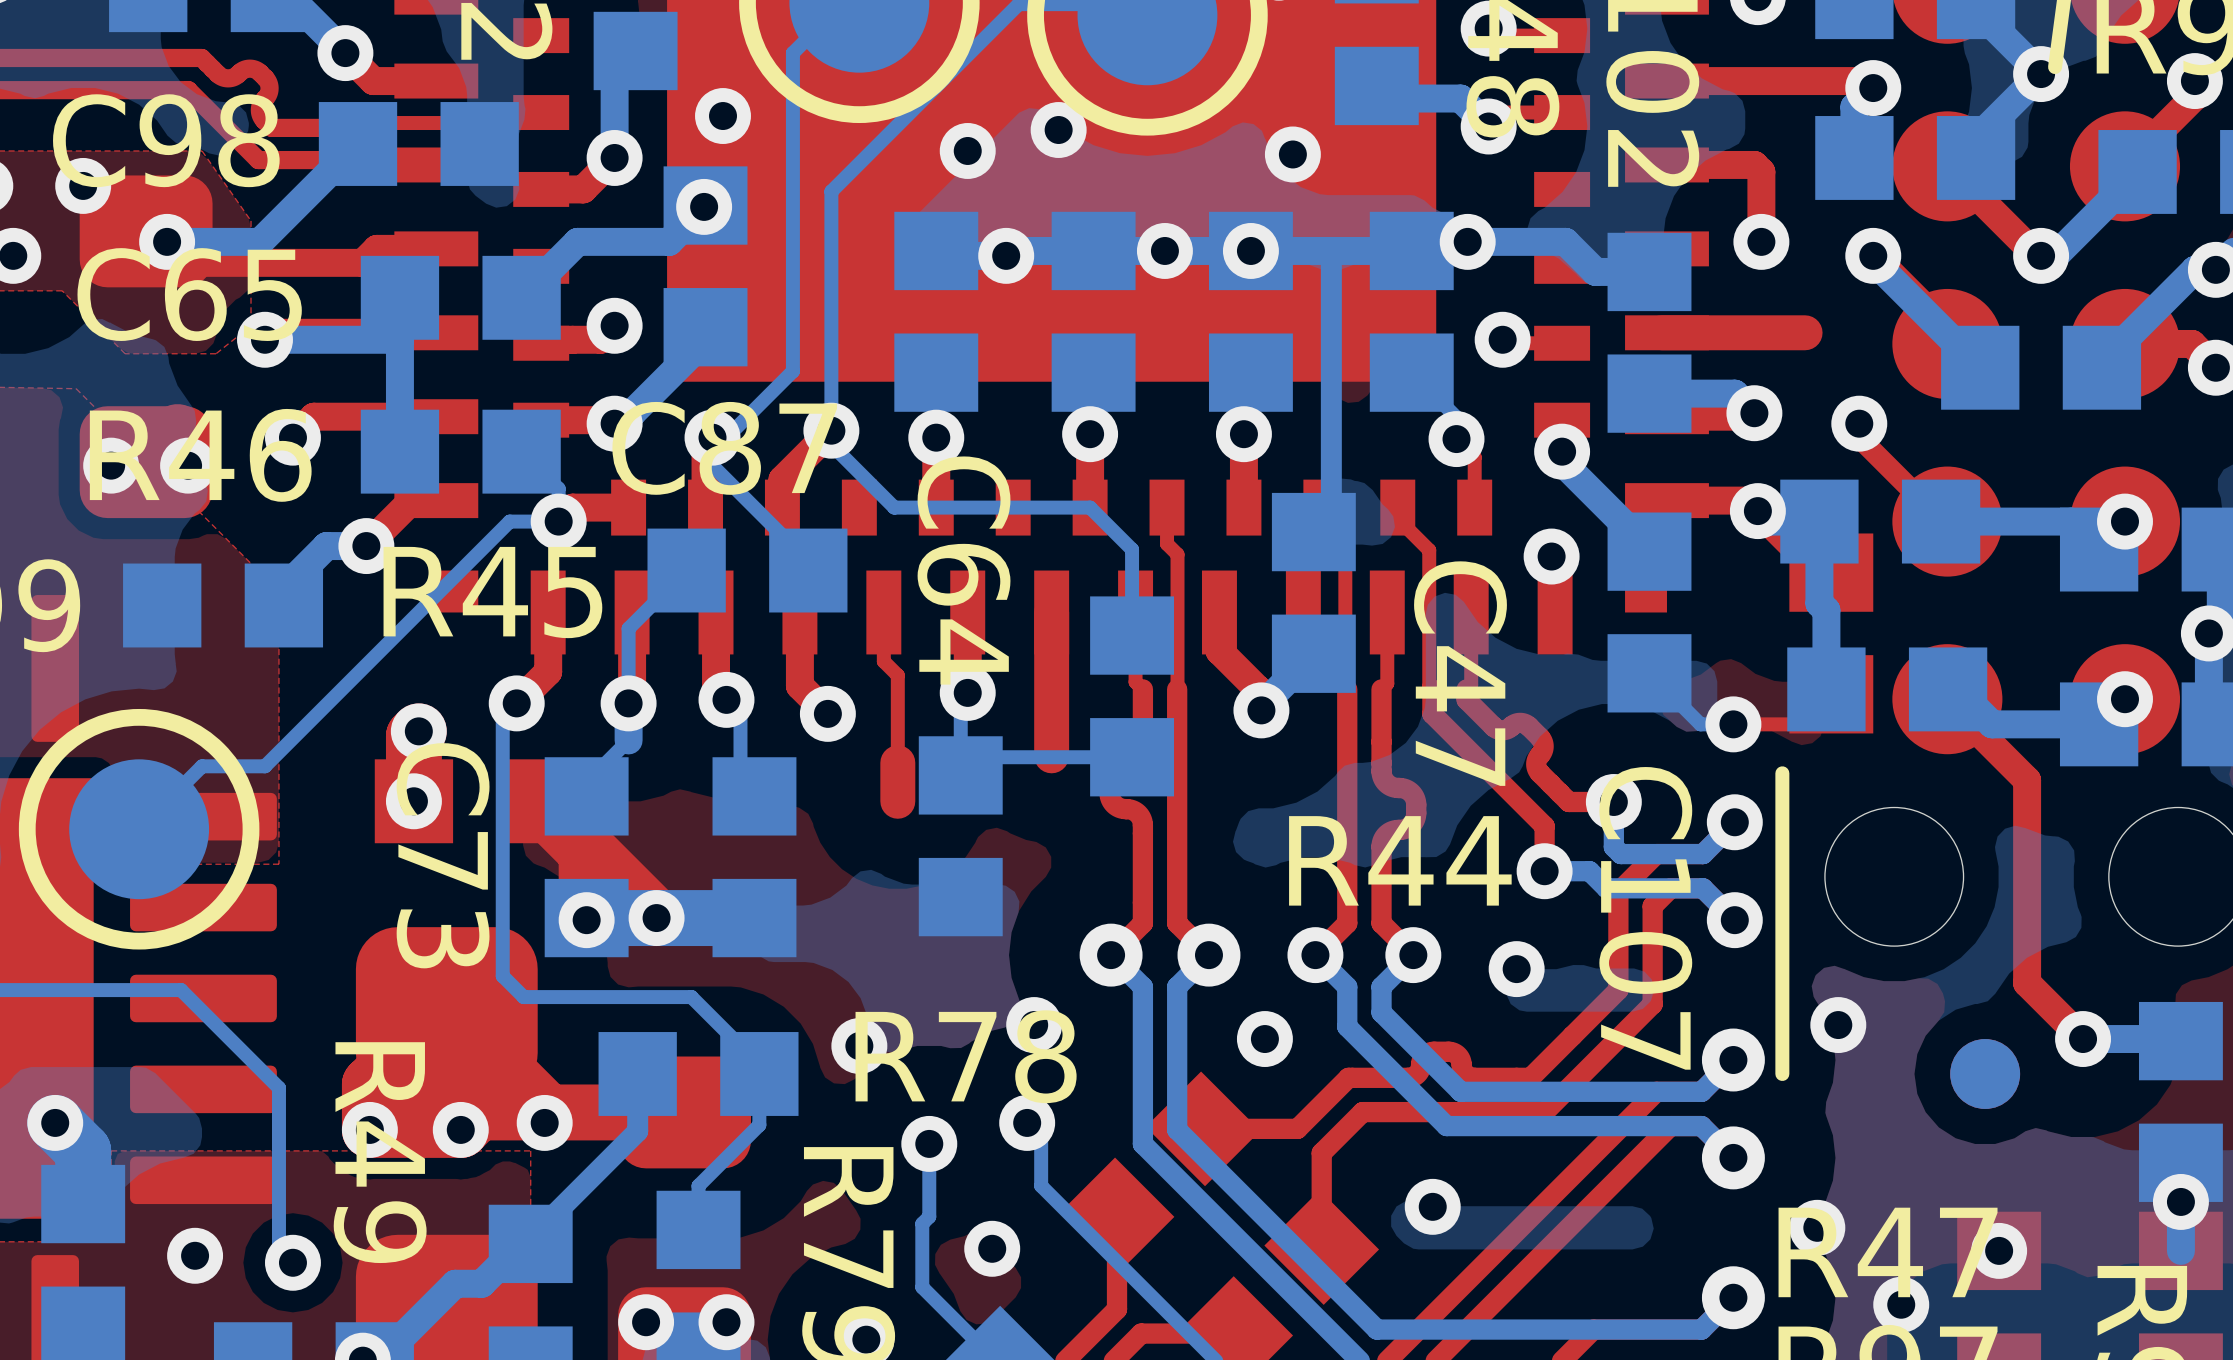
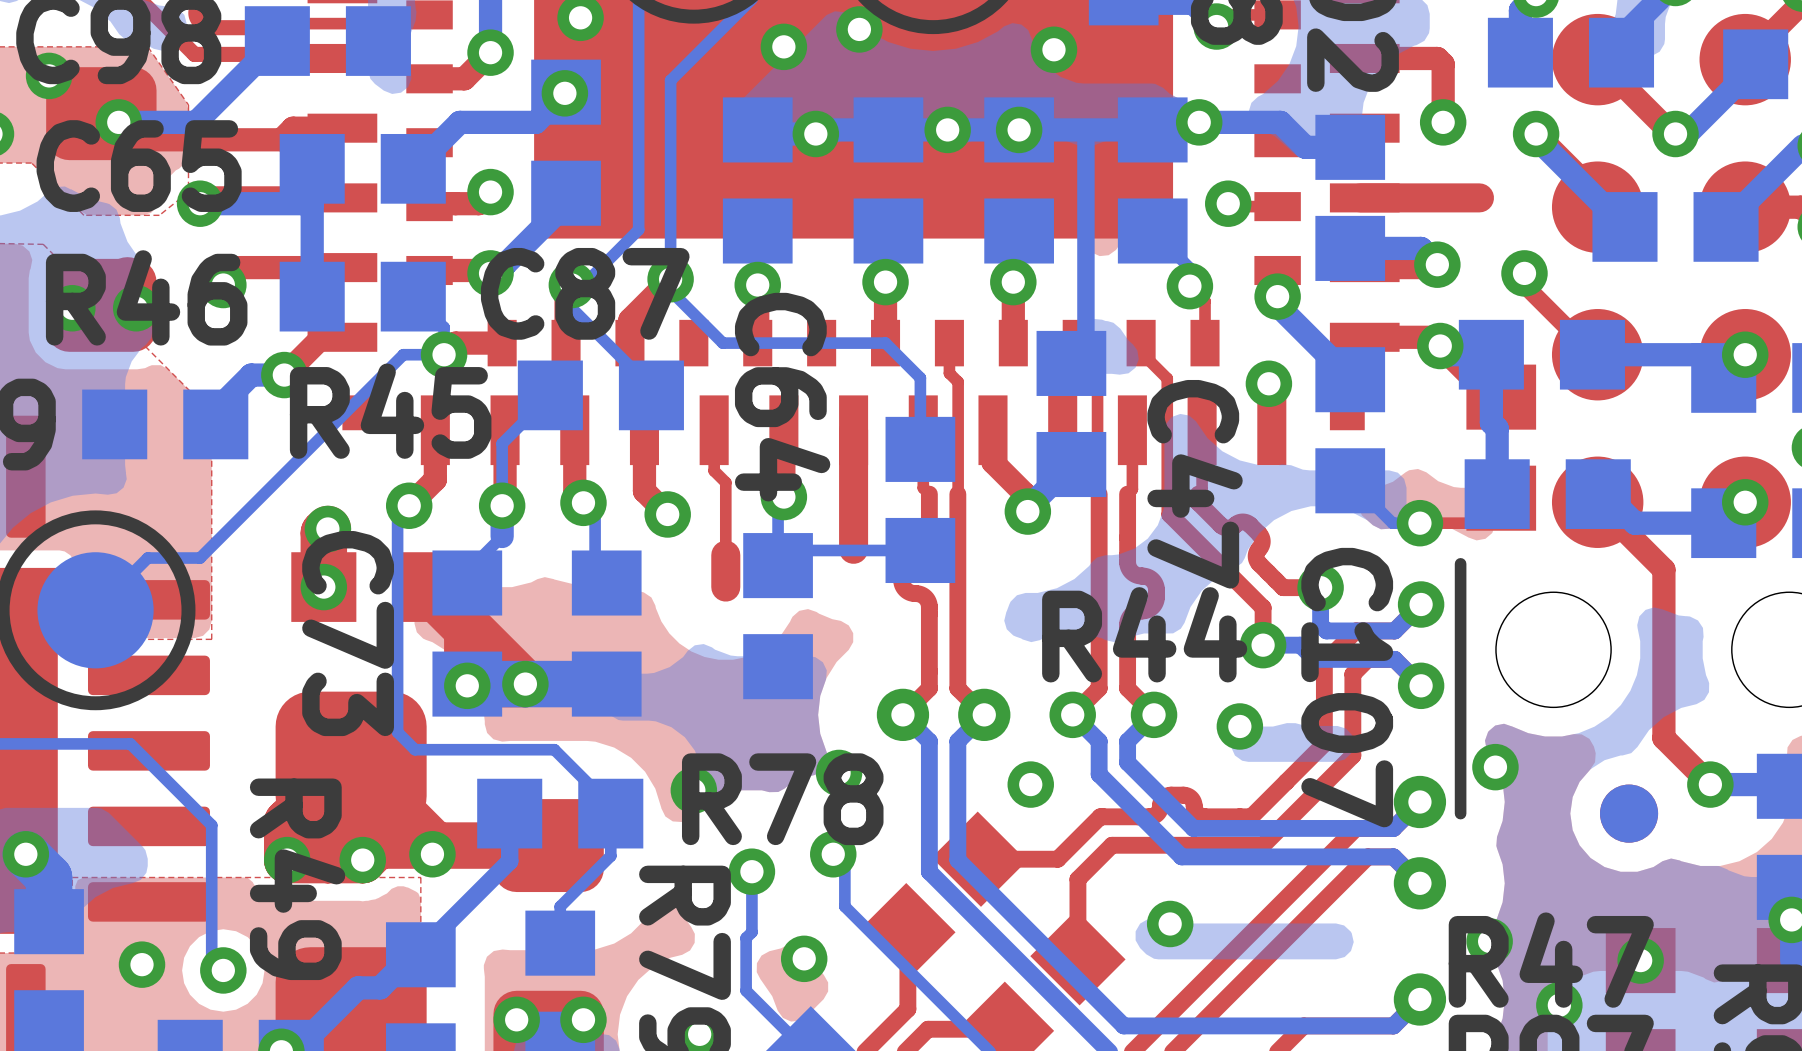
via position: (1838, 1025) -> (1495, 767)

